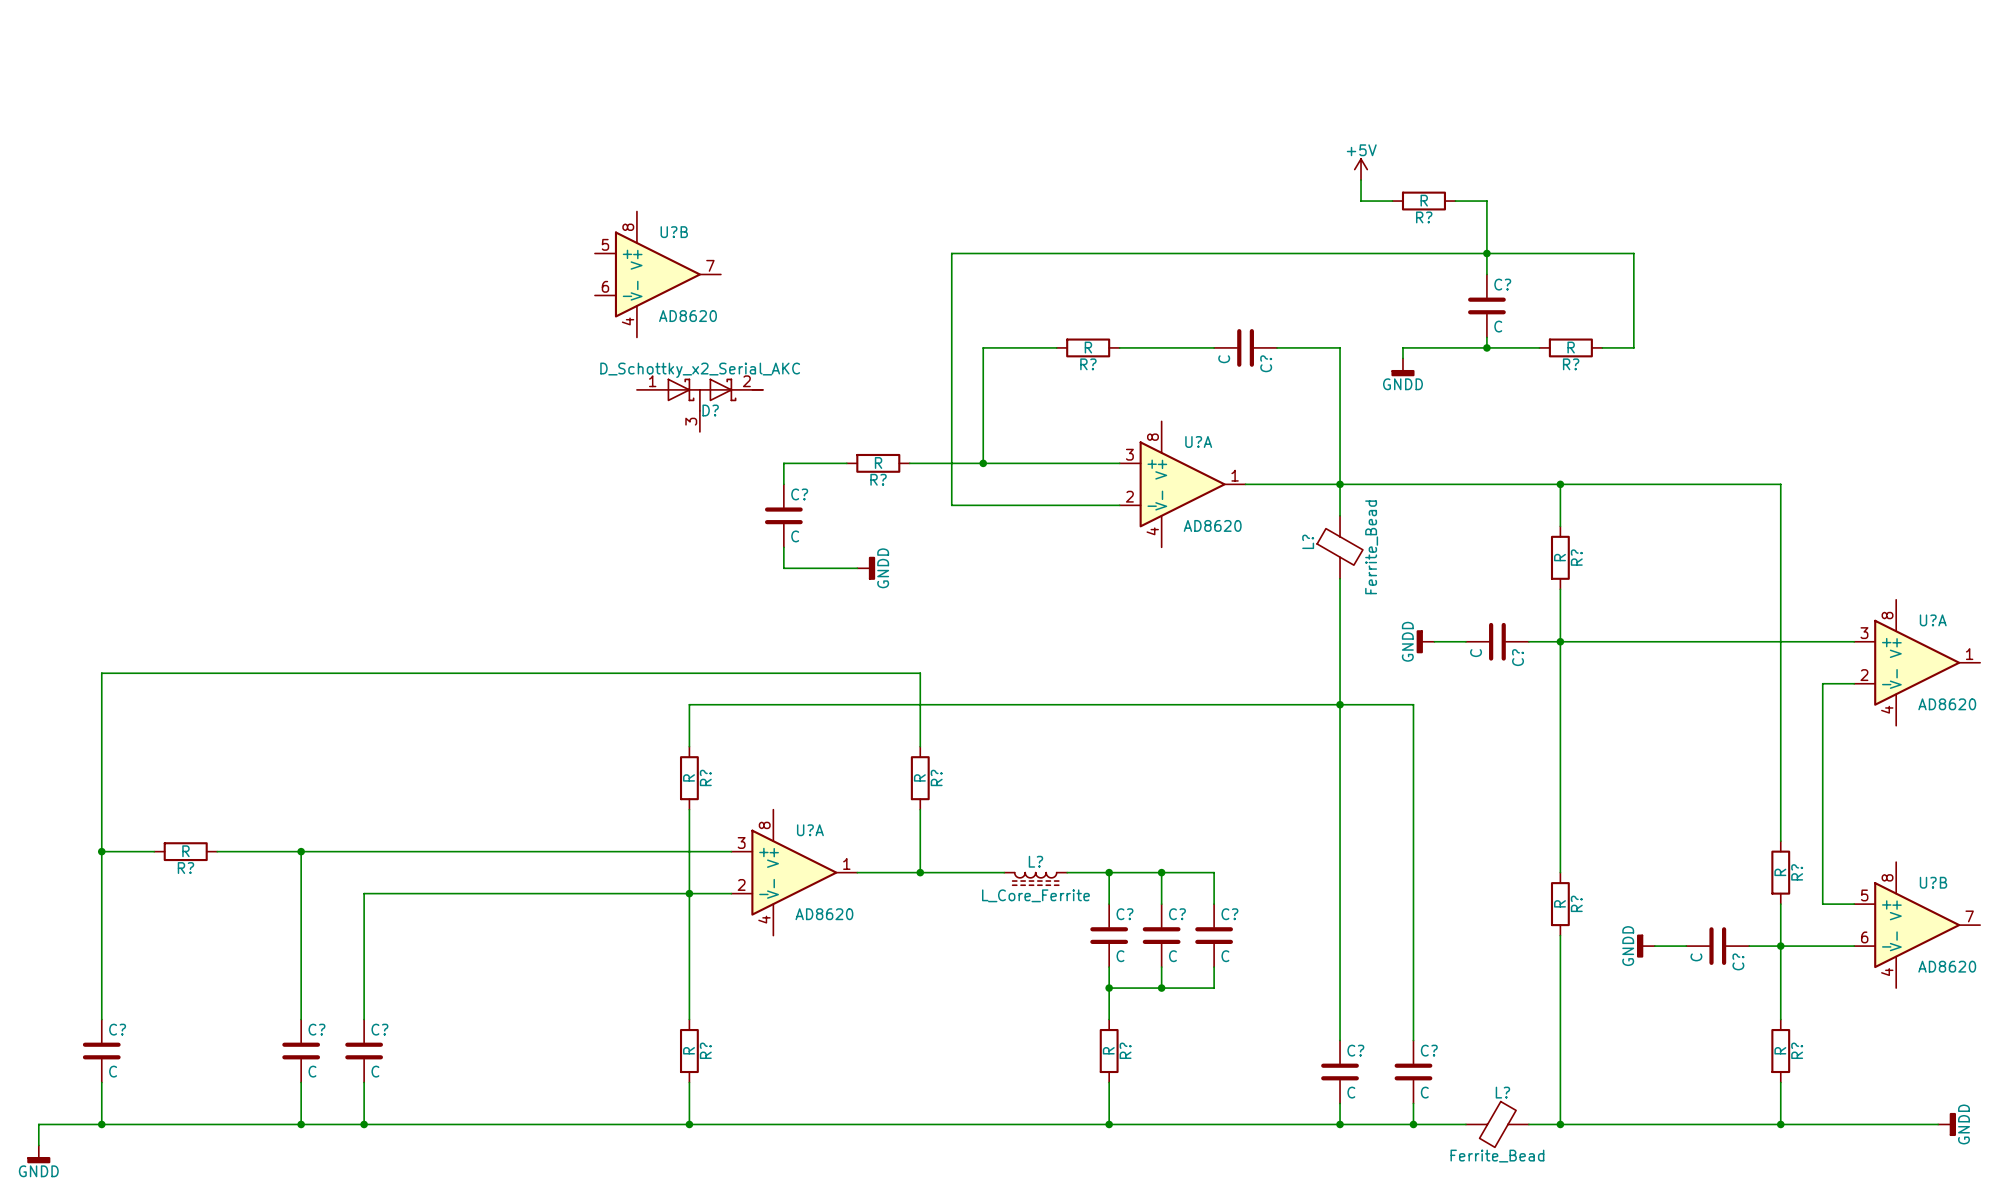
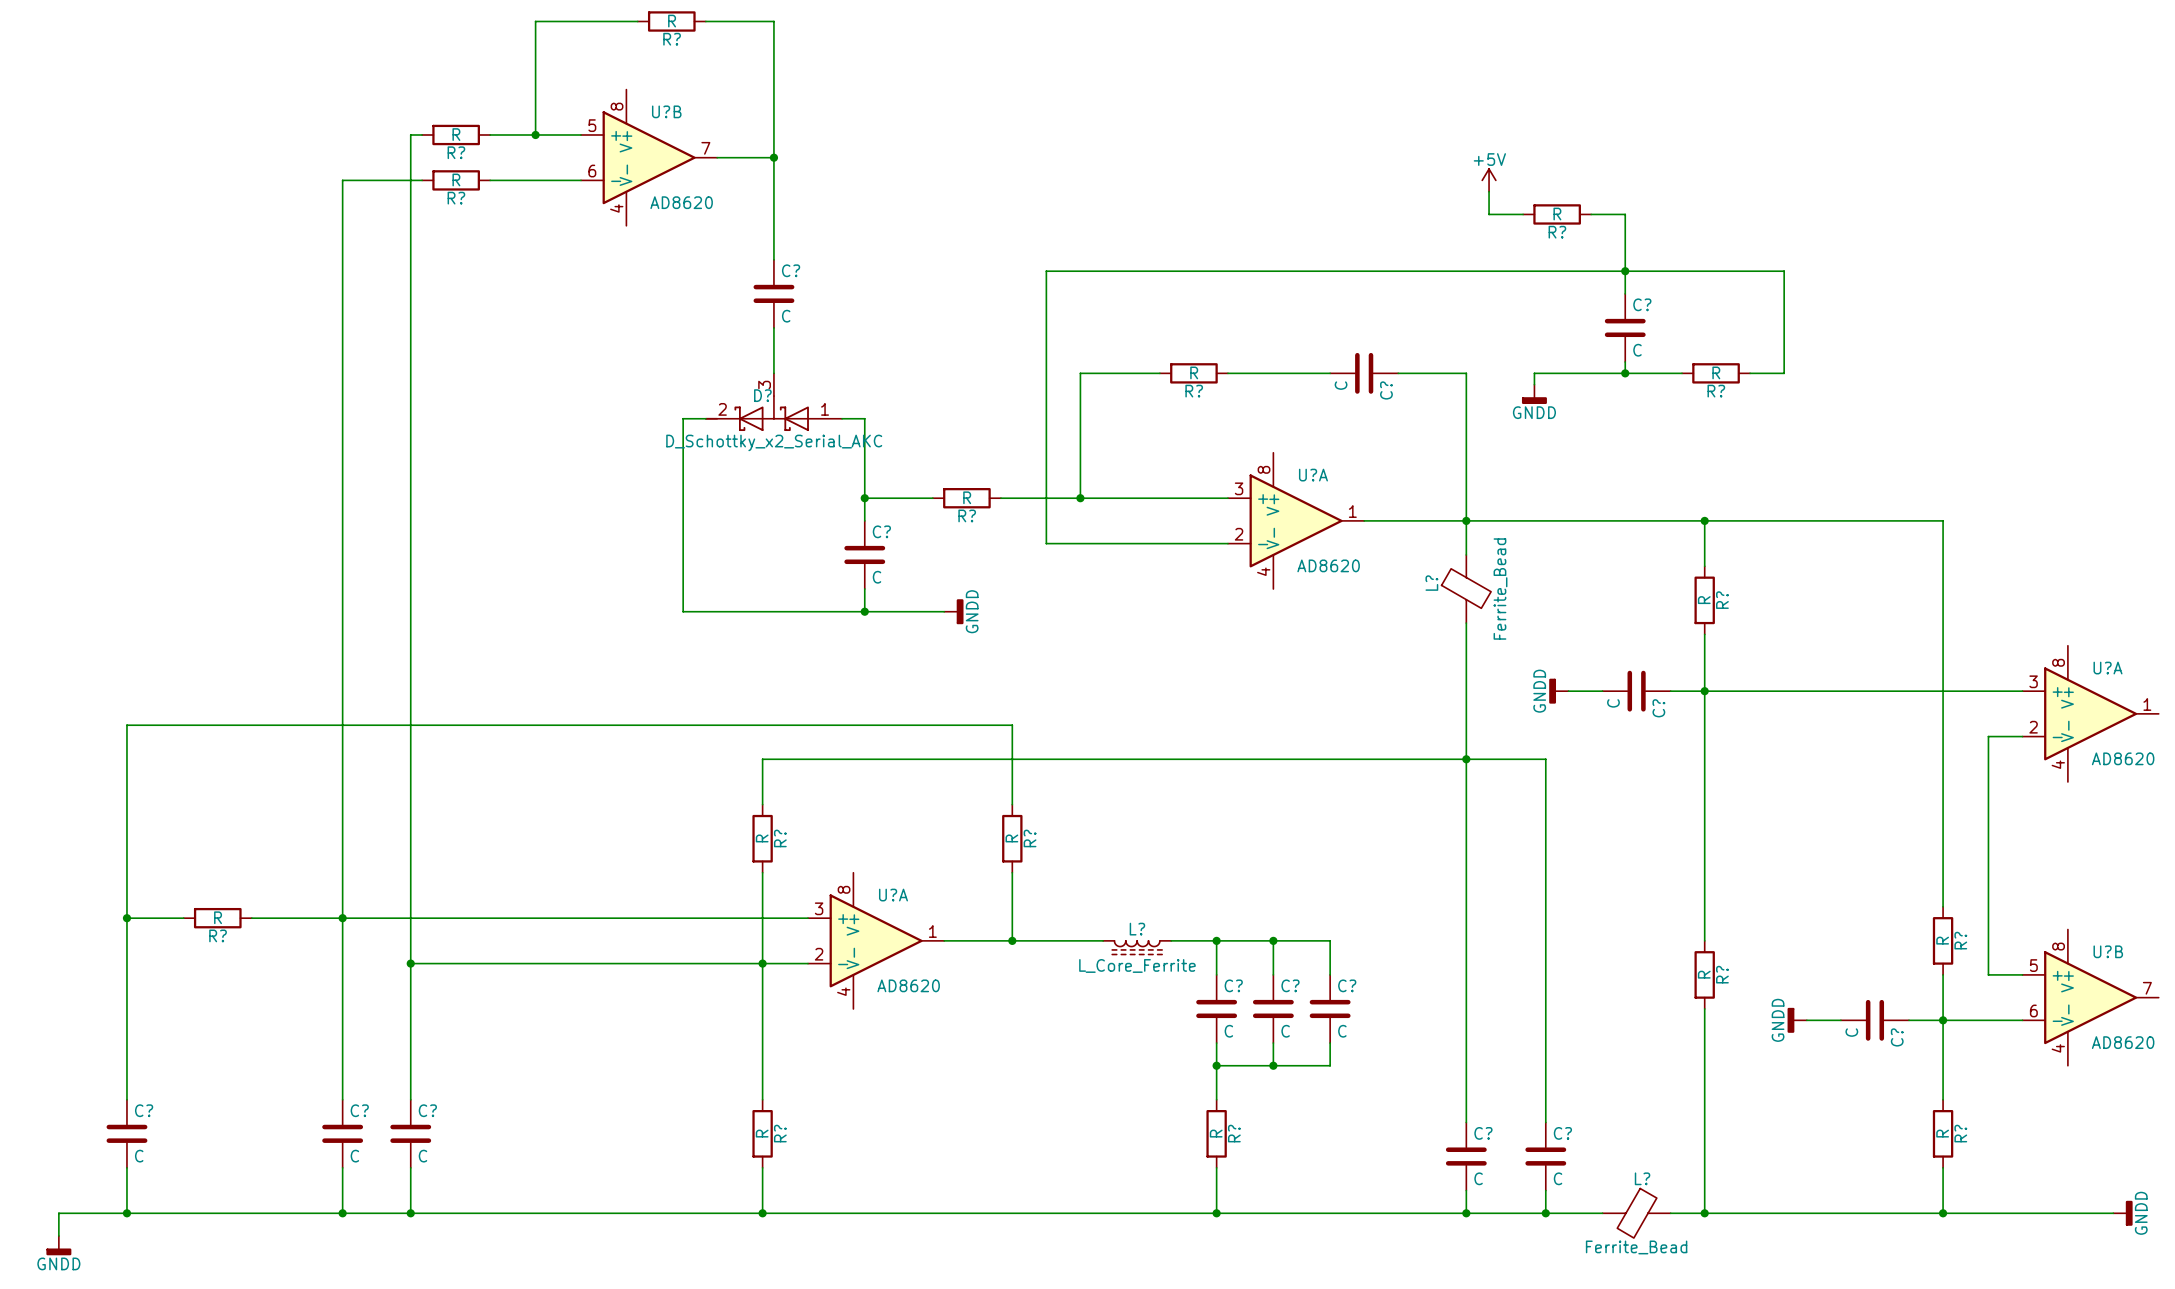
wire: none -> (637, 21) (535, 21) (535, 134)
R?: none -> R (671, 21)
wire: none -> (705, 21) (773, 21) (773, 259)
wire: none -> (422, 134) (410, 134) (410, 963)
R?: none -> R (456, 134)
wire: none -> (490, 134) (581, 134)
junction: none -> (535, 134)
wire: none -> (717, 157) (773, 157)
junction: none -> (773, 157)
wire: none -> (422, 180) (342, 180) (342, 918)
R?: none -> R (456, 180)
wire: none -> (490, 180) (581, 180)
U?B position: (657, 274) -> (649, 157)
C?: none -> C (773, 293)
wire: none -> (773, 327) (773, 373)
wire: none -> (705, 418) (683, 418) (683, 611) (864, 611)
wire: none -> (842, 418) (864, 418) (864, 498)
D? rotation: 0° (715, 394) -> 180° (757, 413)
junction: none -> (864, 498)
junction: none -> (864, 611)
junction: none -> (410, 963)

